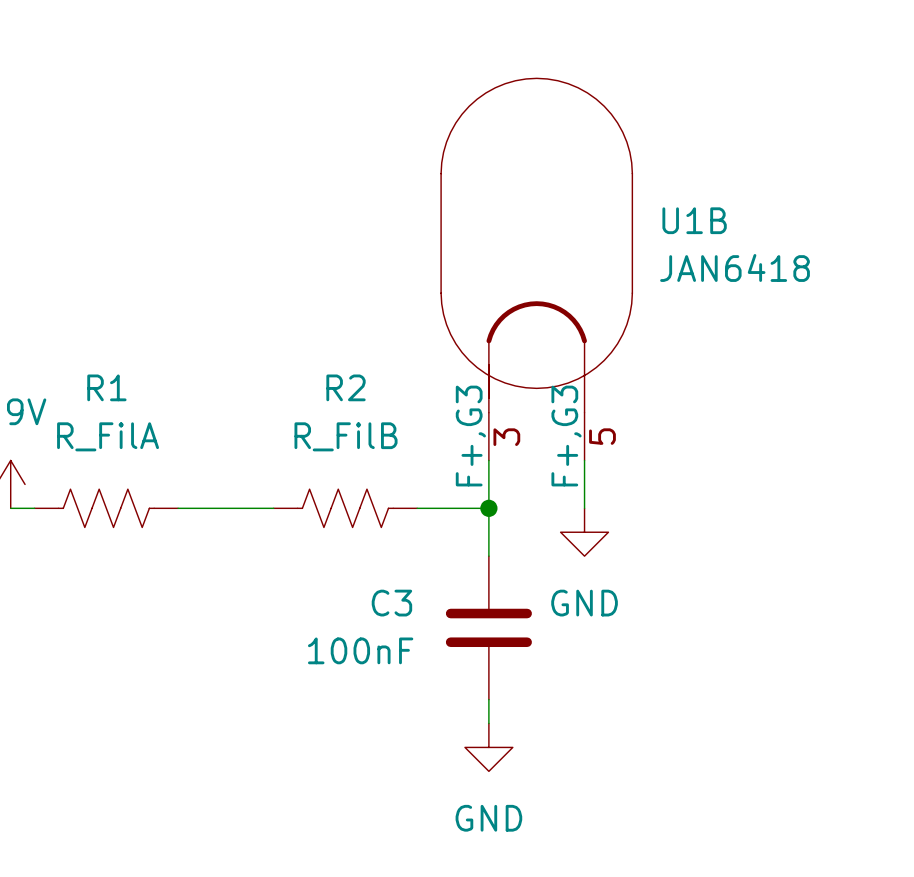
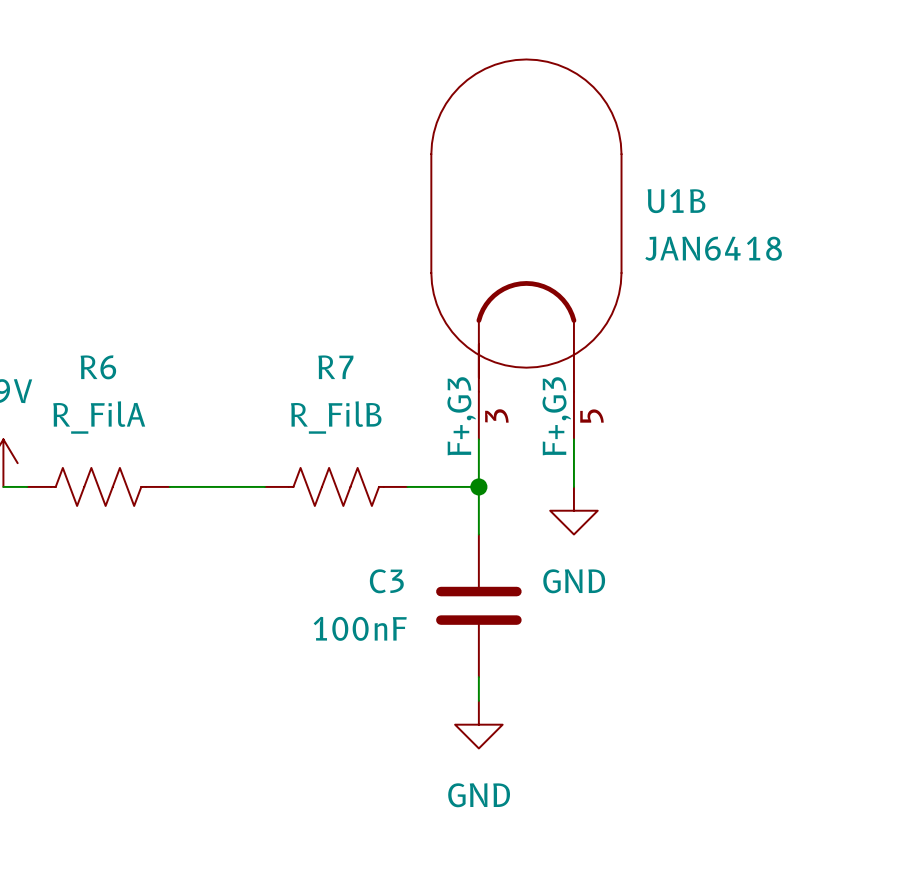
R1 name: R1 (106, 387) -> R6 (98, 367)
R2 name: R2 (346, 387) -> R7 (335, 367)

